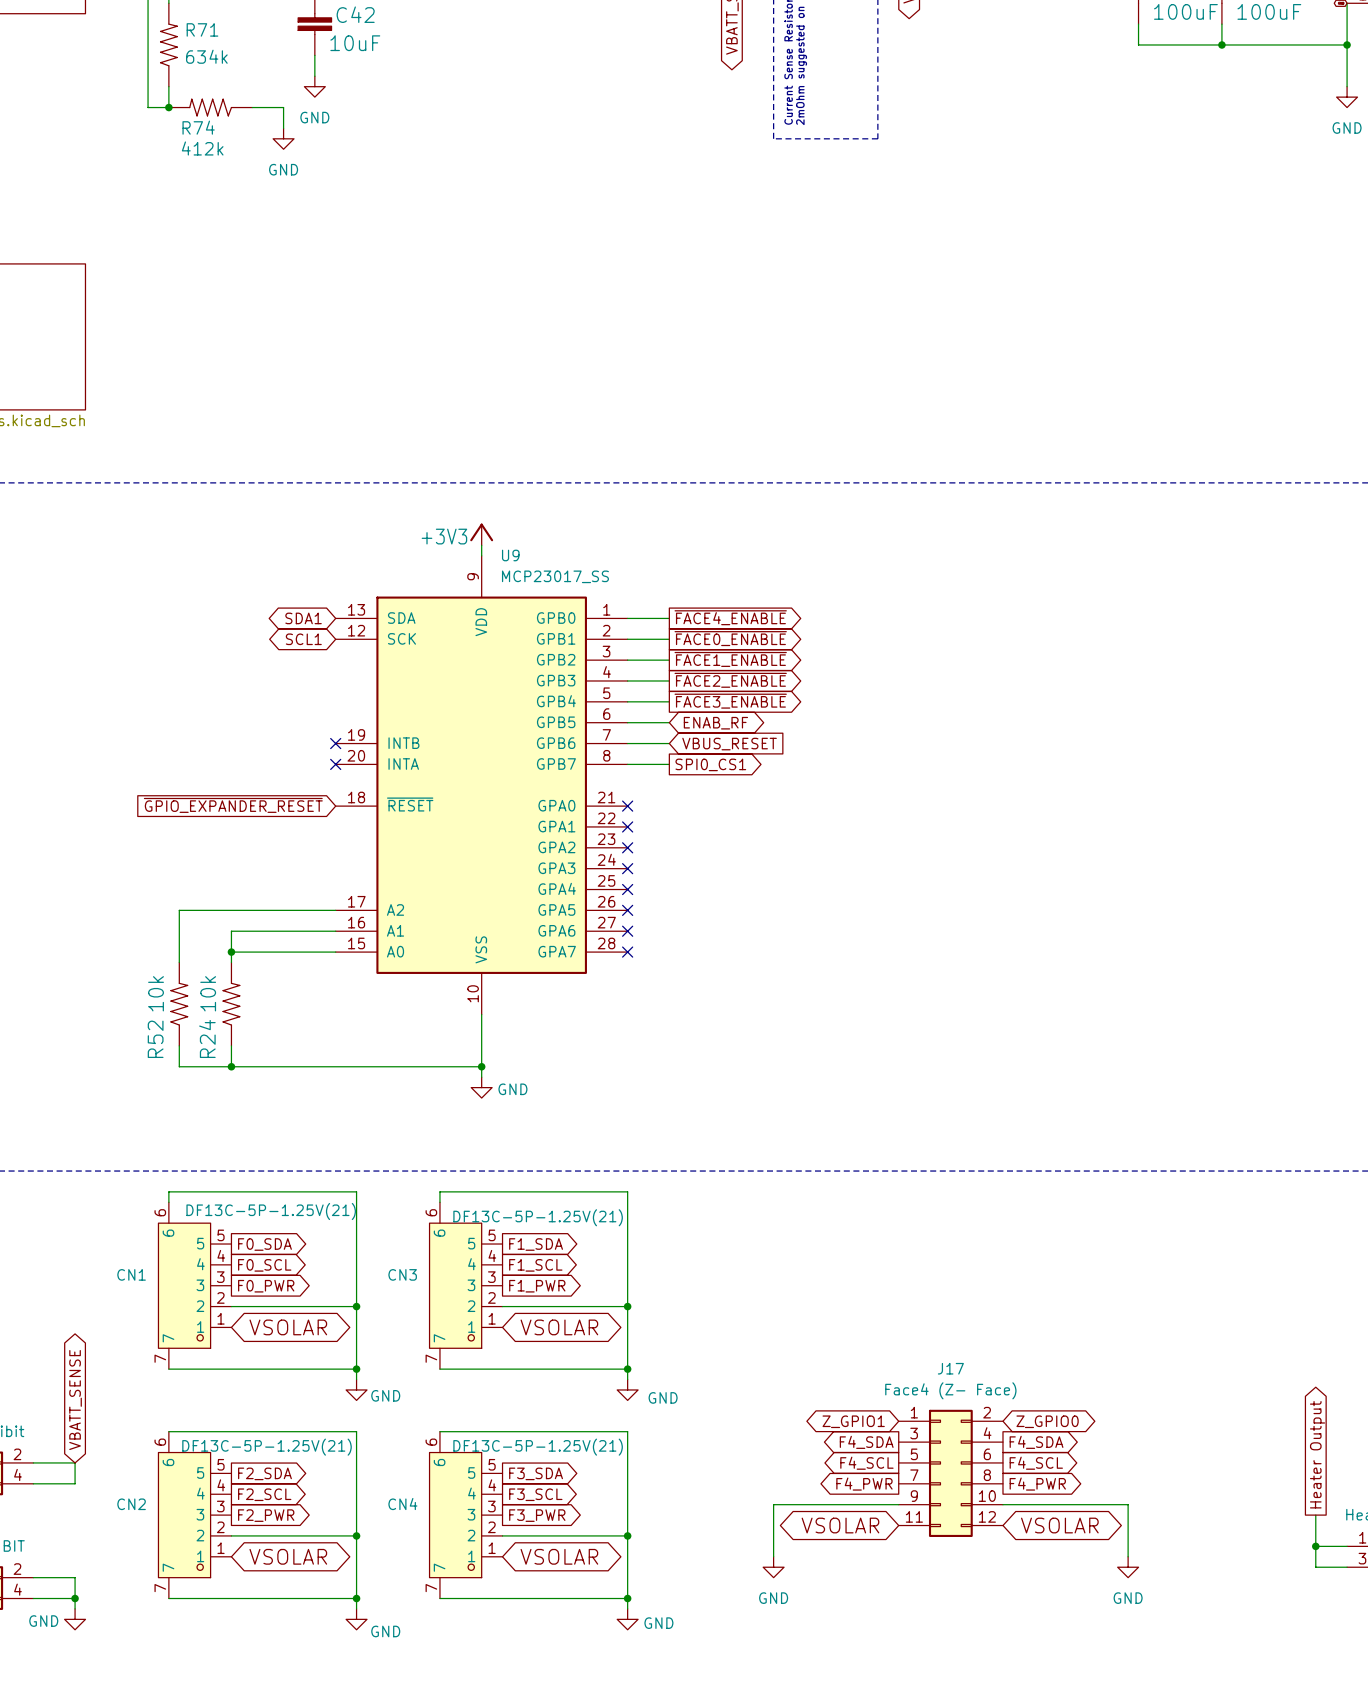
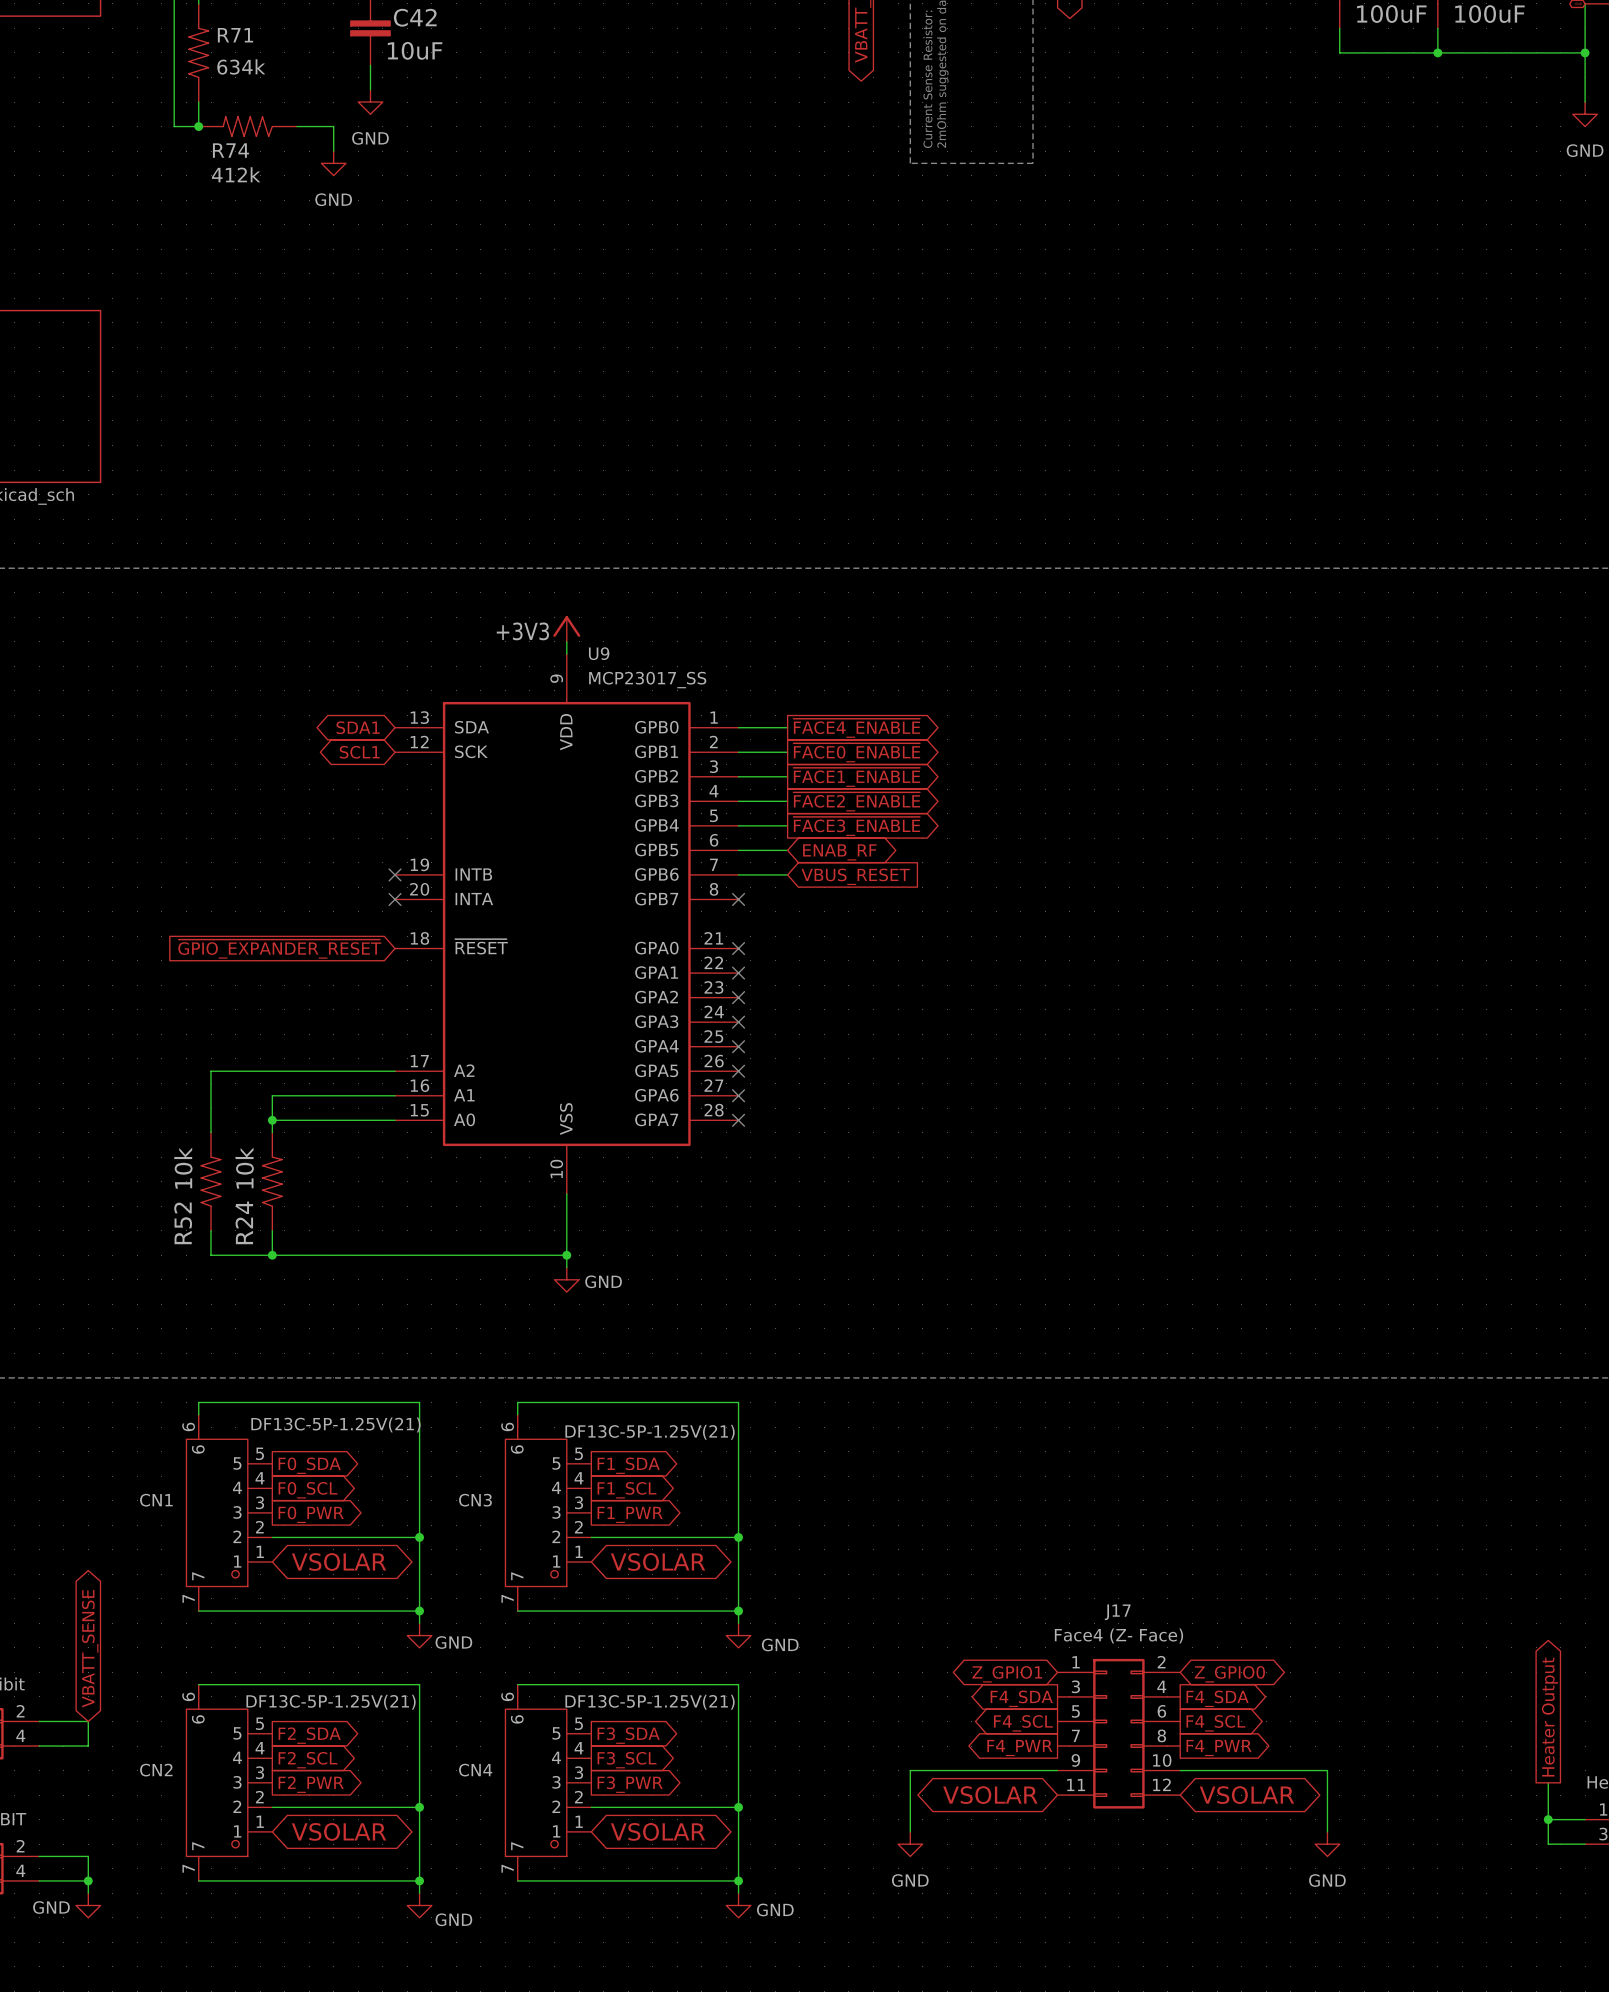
wire: (627, 764) (669, 764) -> none
no-connect mark: none -> (738, 899)
global label: SPI0_CS1 (710, 764) -> none

